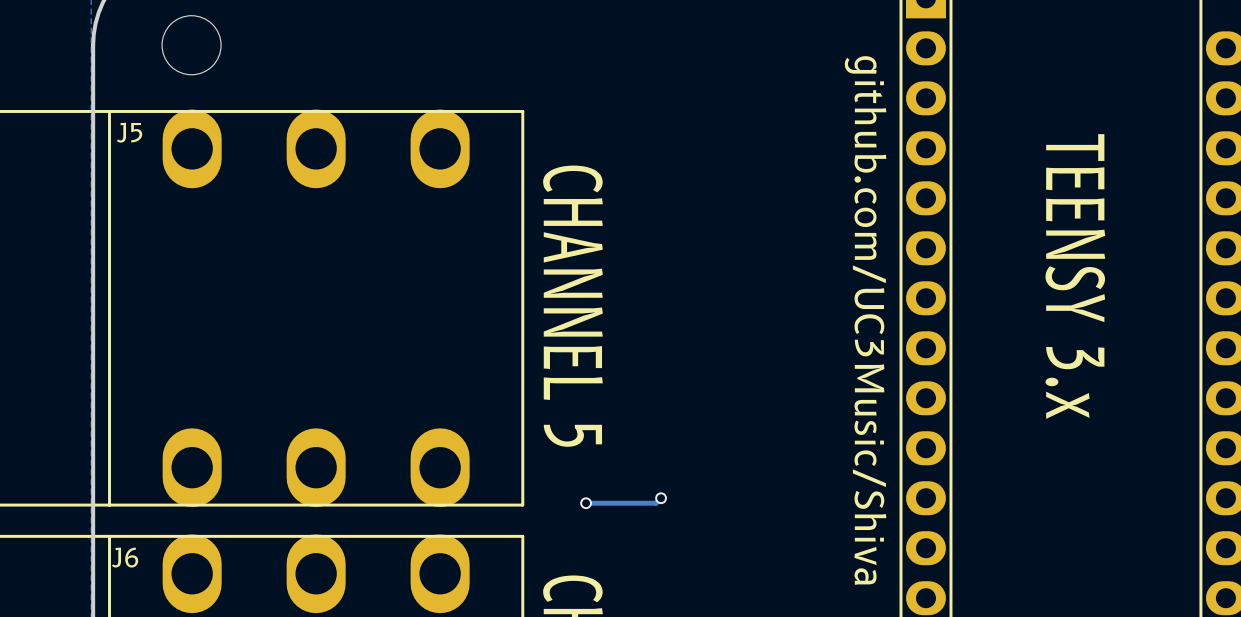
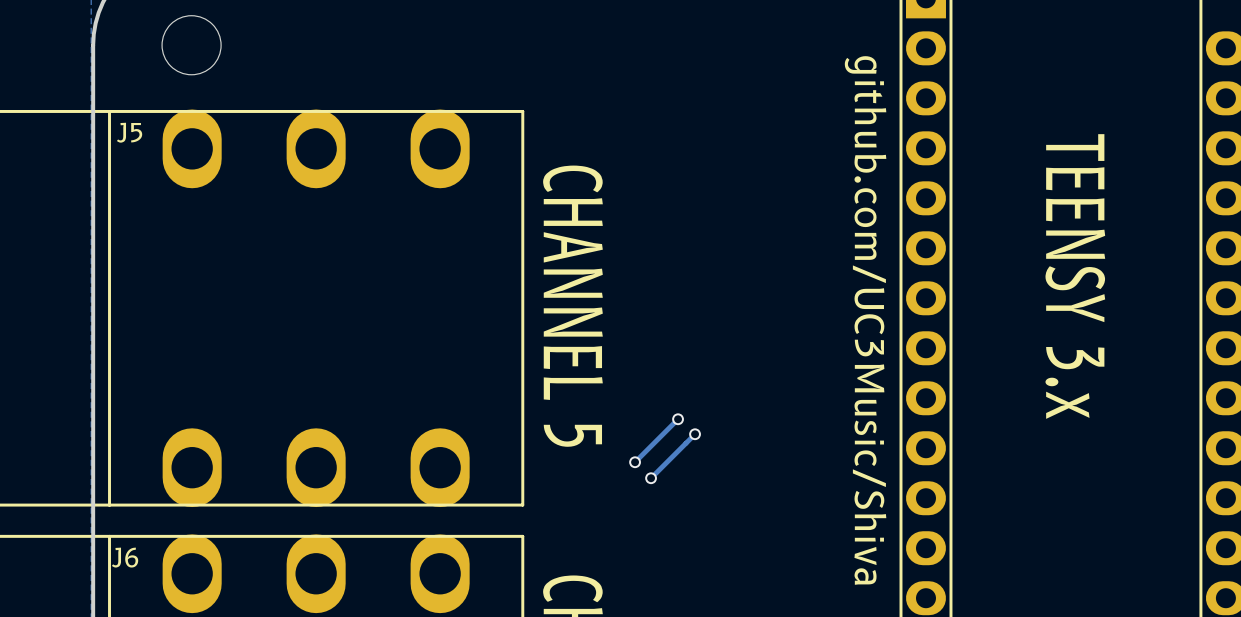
track: none -> (678, 419) (635, 462)
via: none -> (678, 419)
track: none -> (695, 434) (651, 478)
via: none -> (695, 434)
via: none -> (635, 462)
via: none -> (651, 478)
track: (661, 498) (656, 503) (586, 503) -> none
via: (661, 498) -> none
via: (586, 503) -> none

